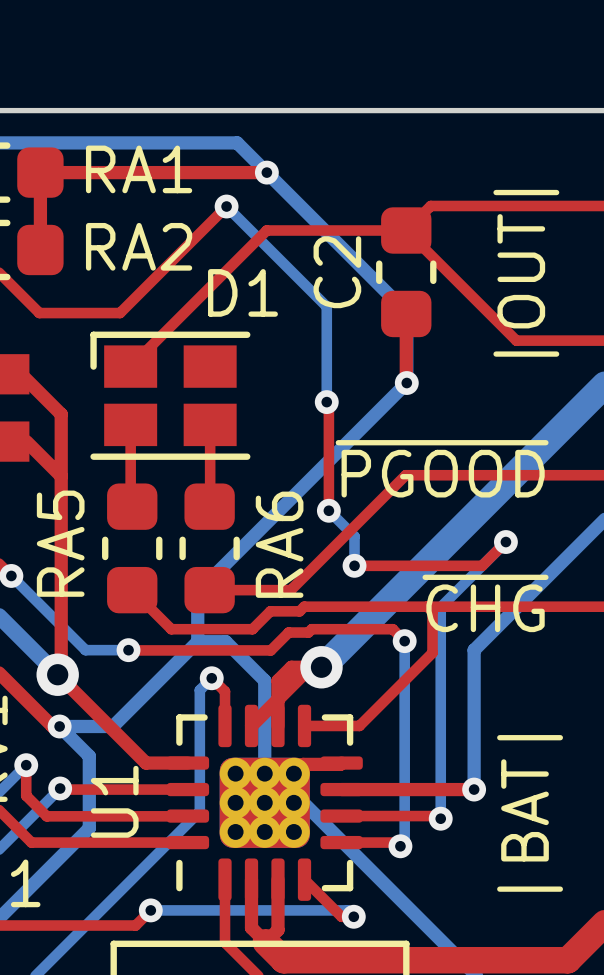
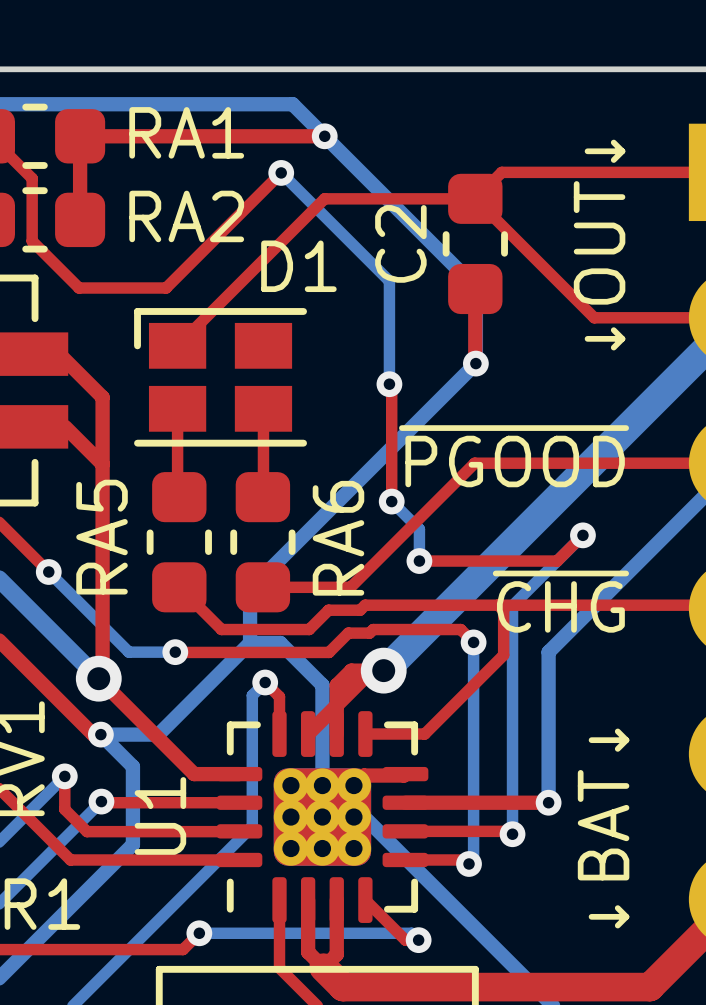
text: |OUT| (526, 273) -> ↓OUT↓ (599, 245)
text: |BAT| (530, 813) -> ↓BAT↓ (603, 828)

